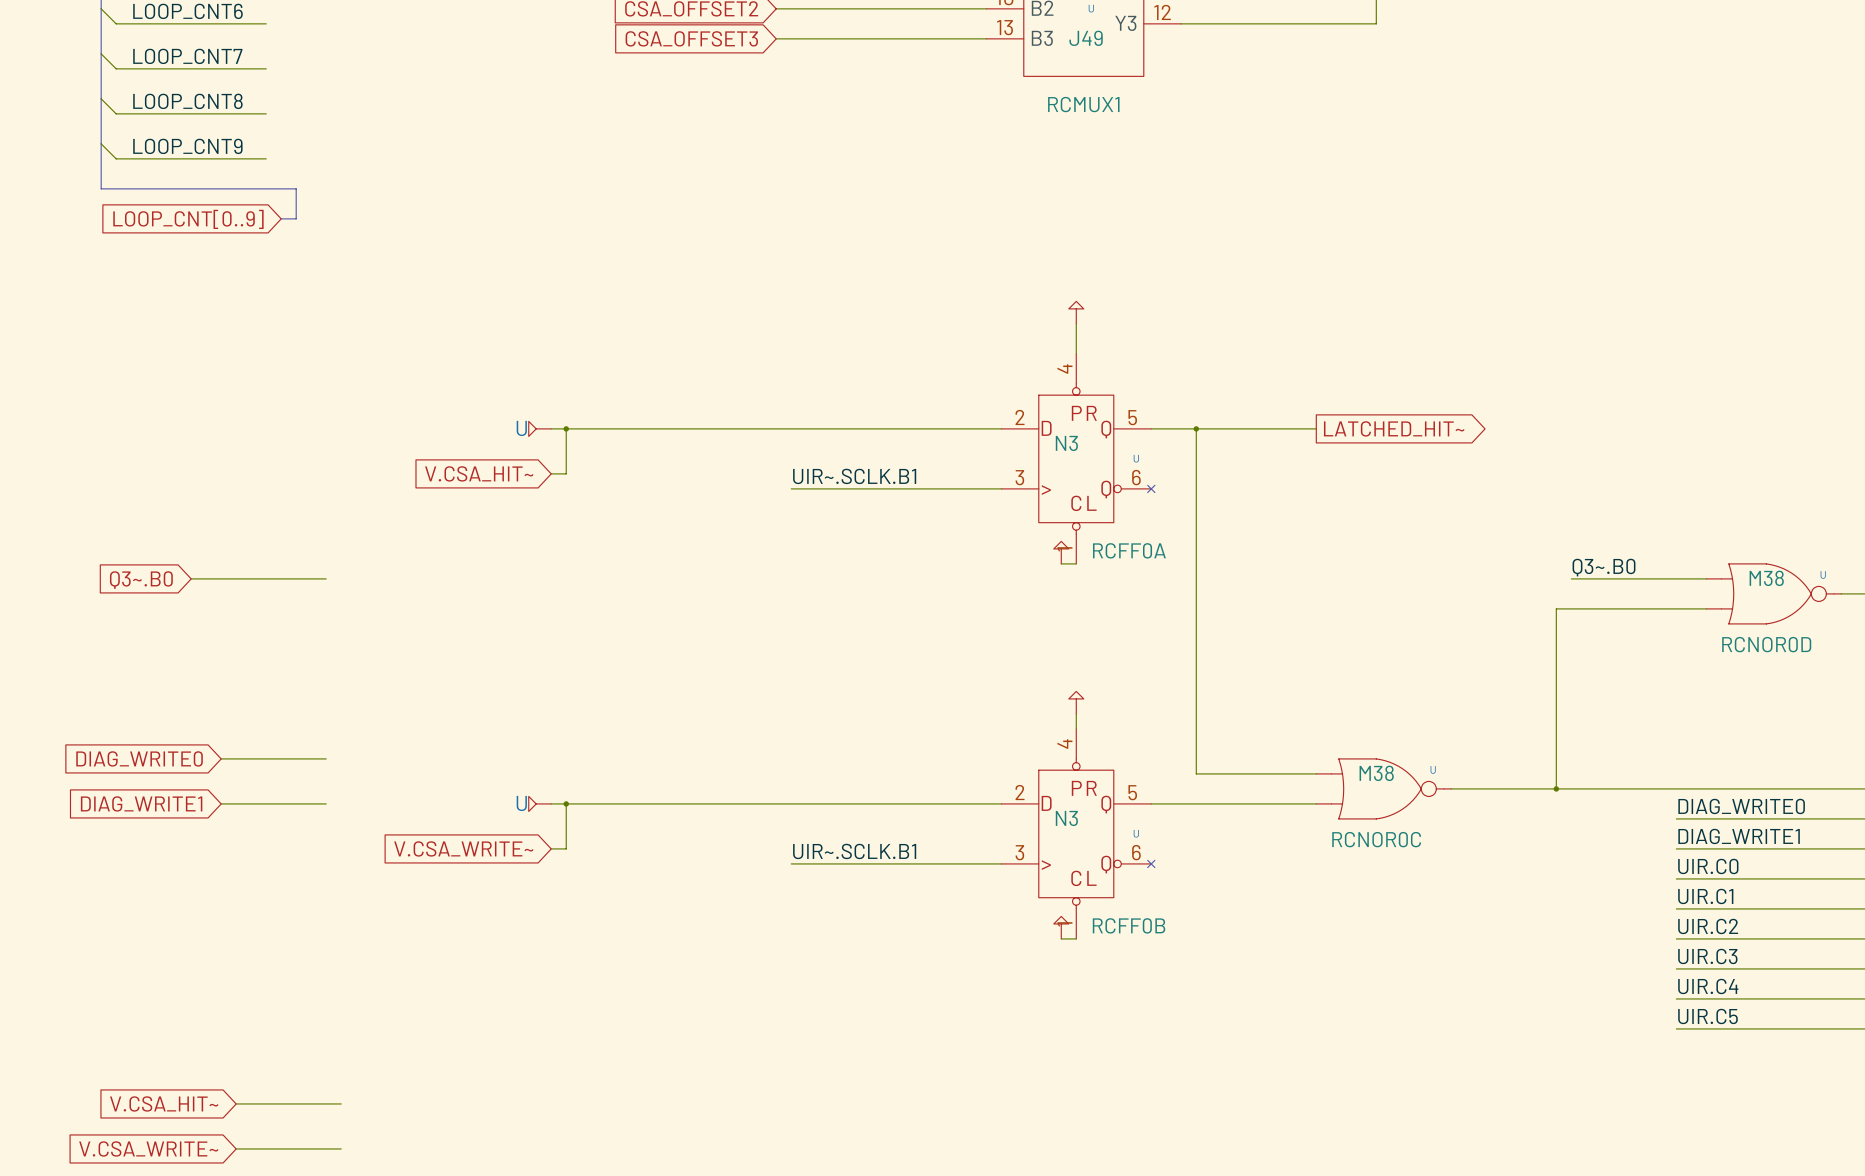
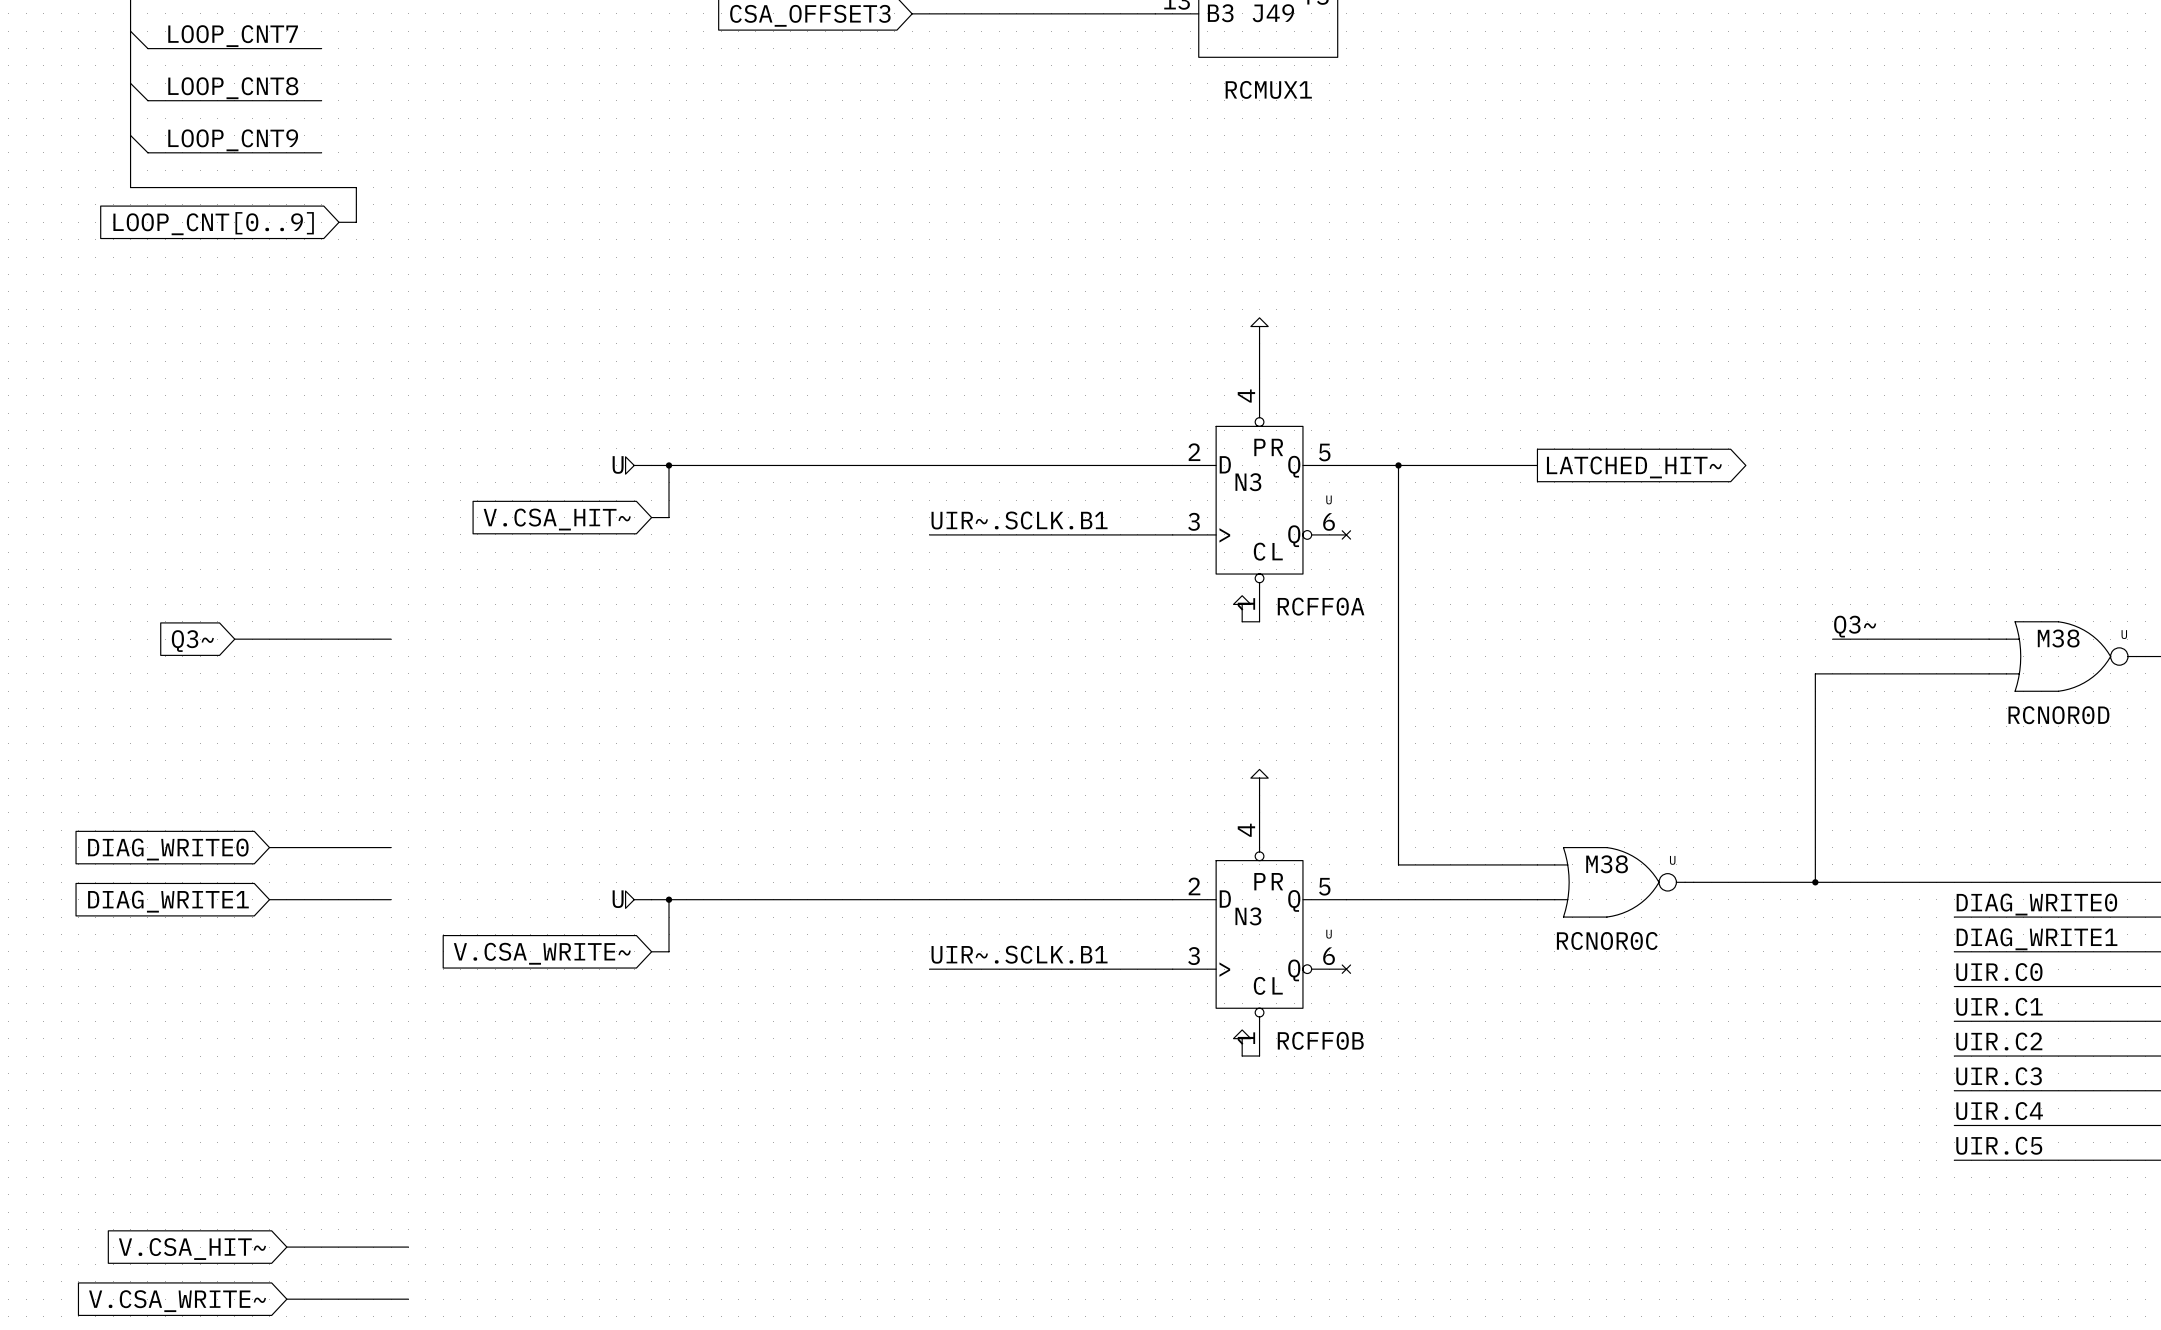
label: Q3~.B0 (1604, 567) -> Q3~ (1855, 626)
global label: Q3~.B0 (141, 580) -> Q3~ (192, 641)

